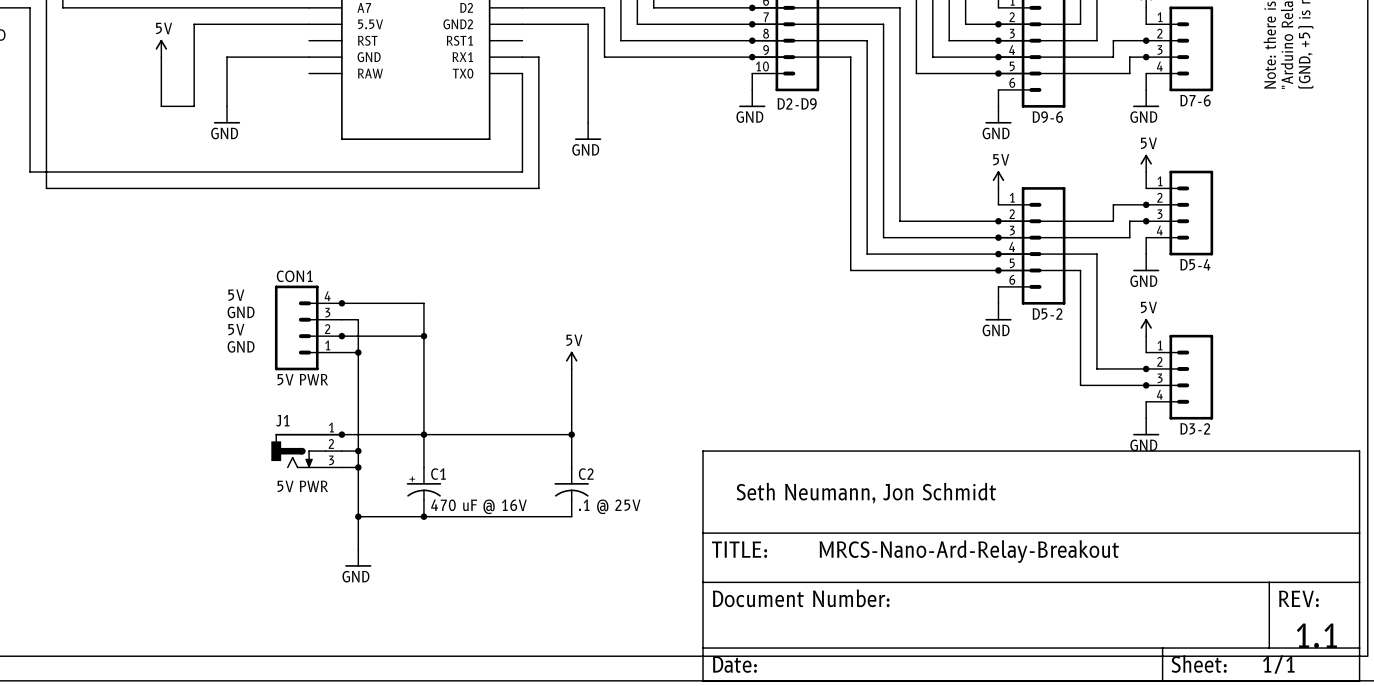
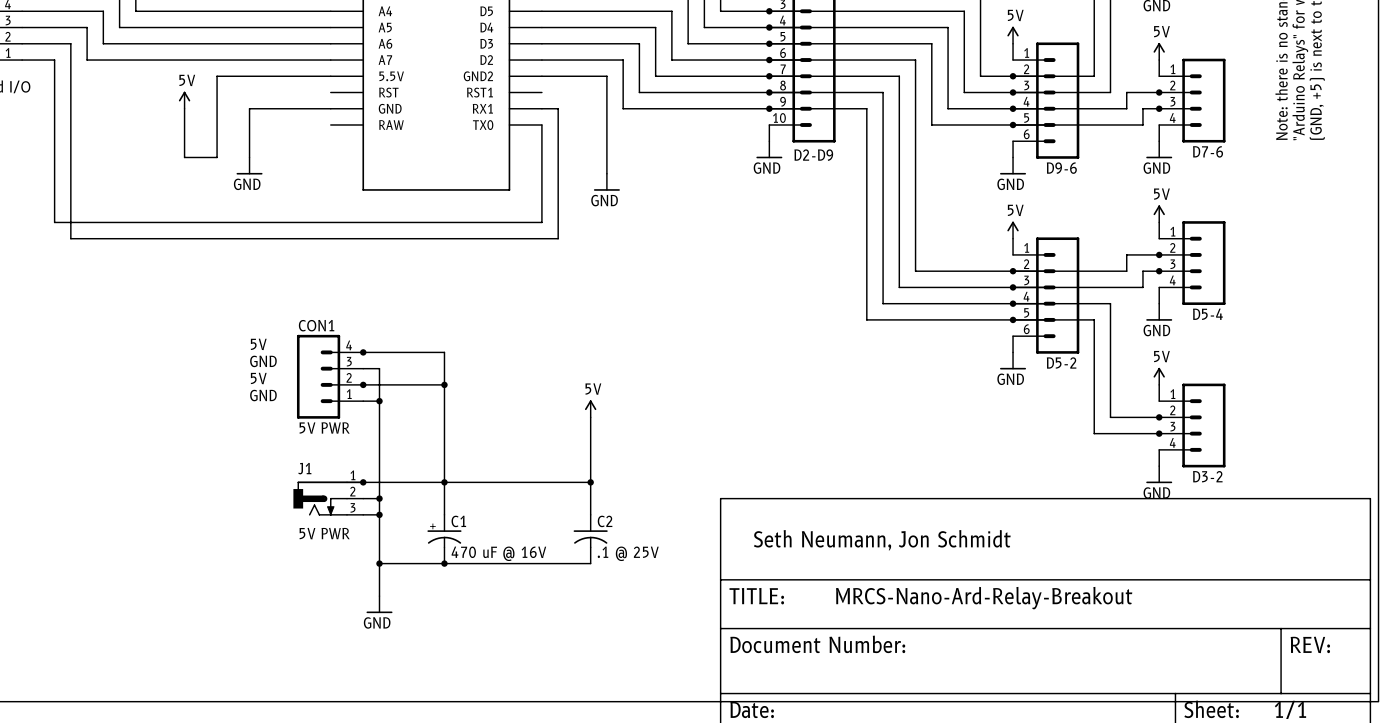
text: 1.1 (1316, 635) -> none

